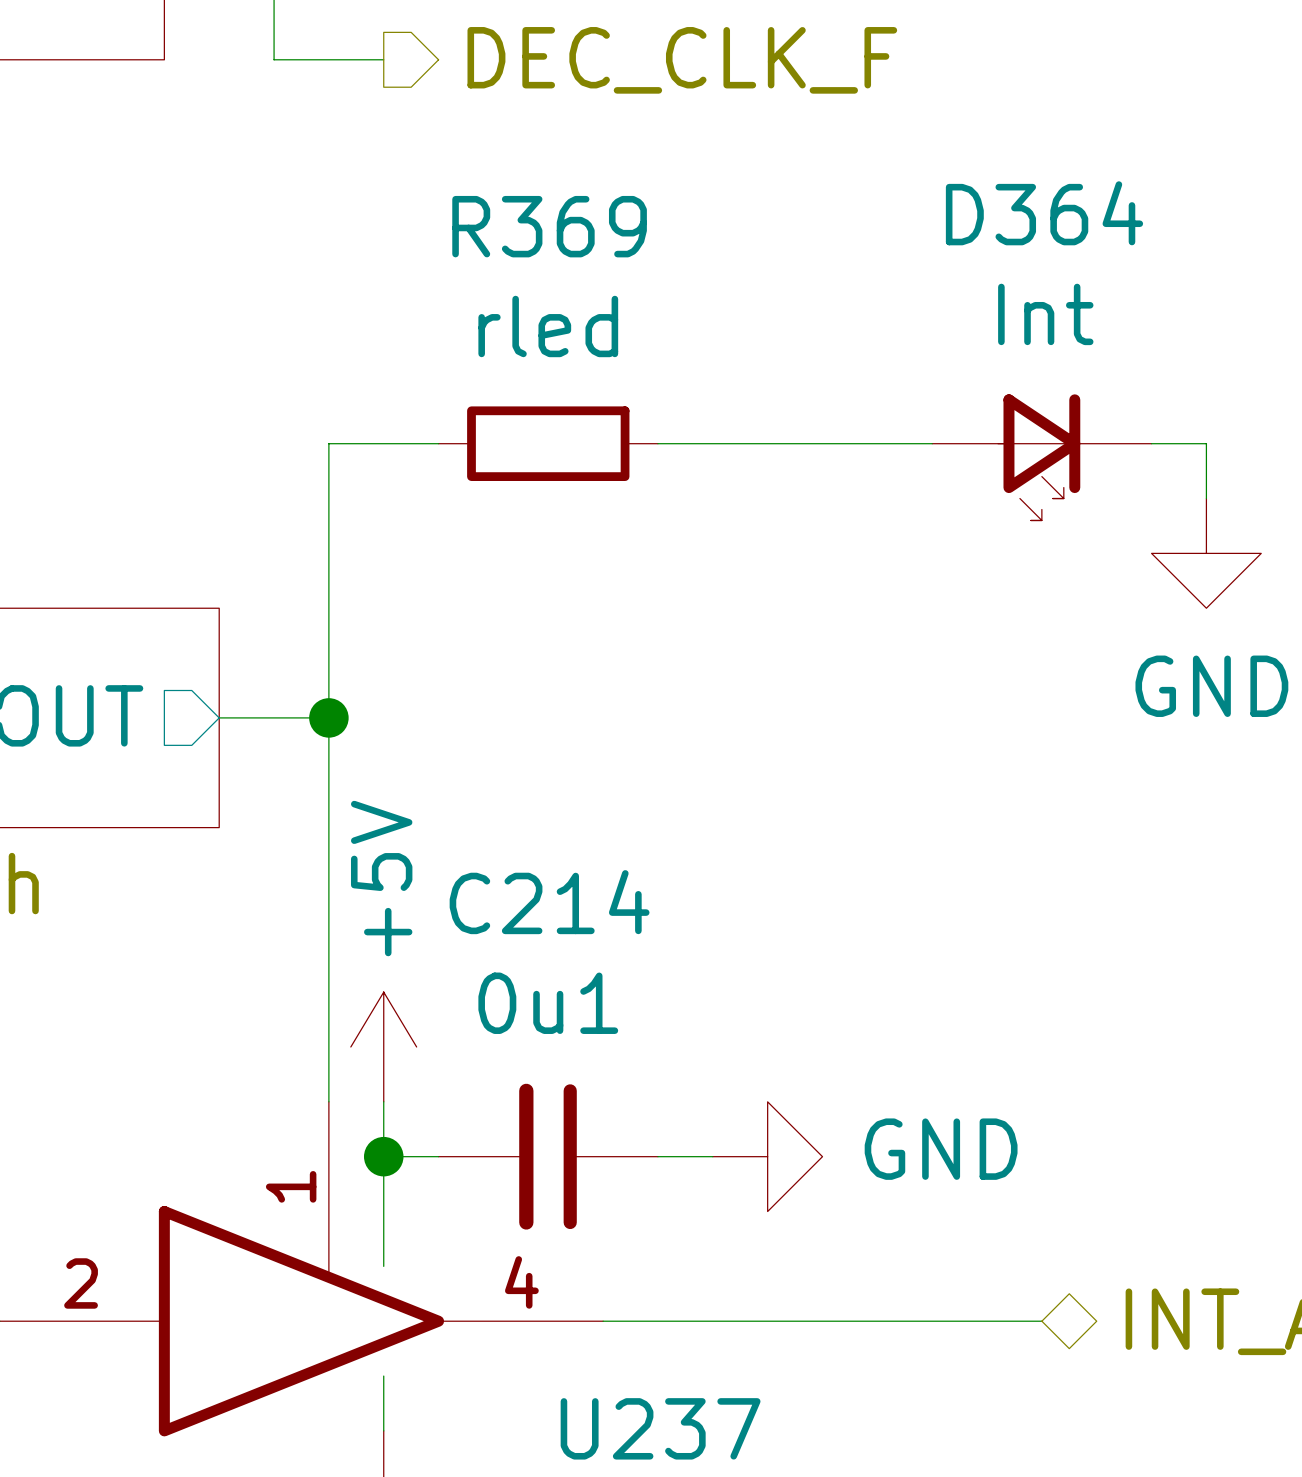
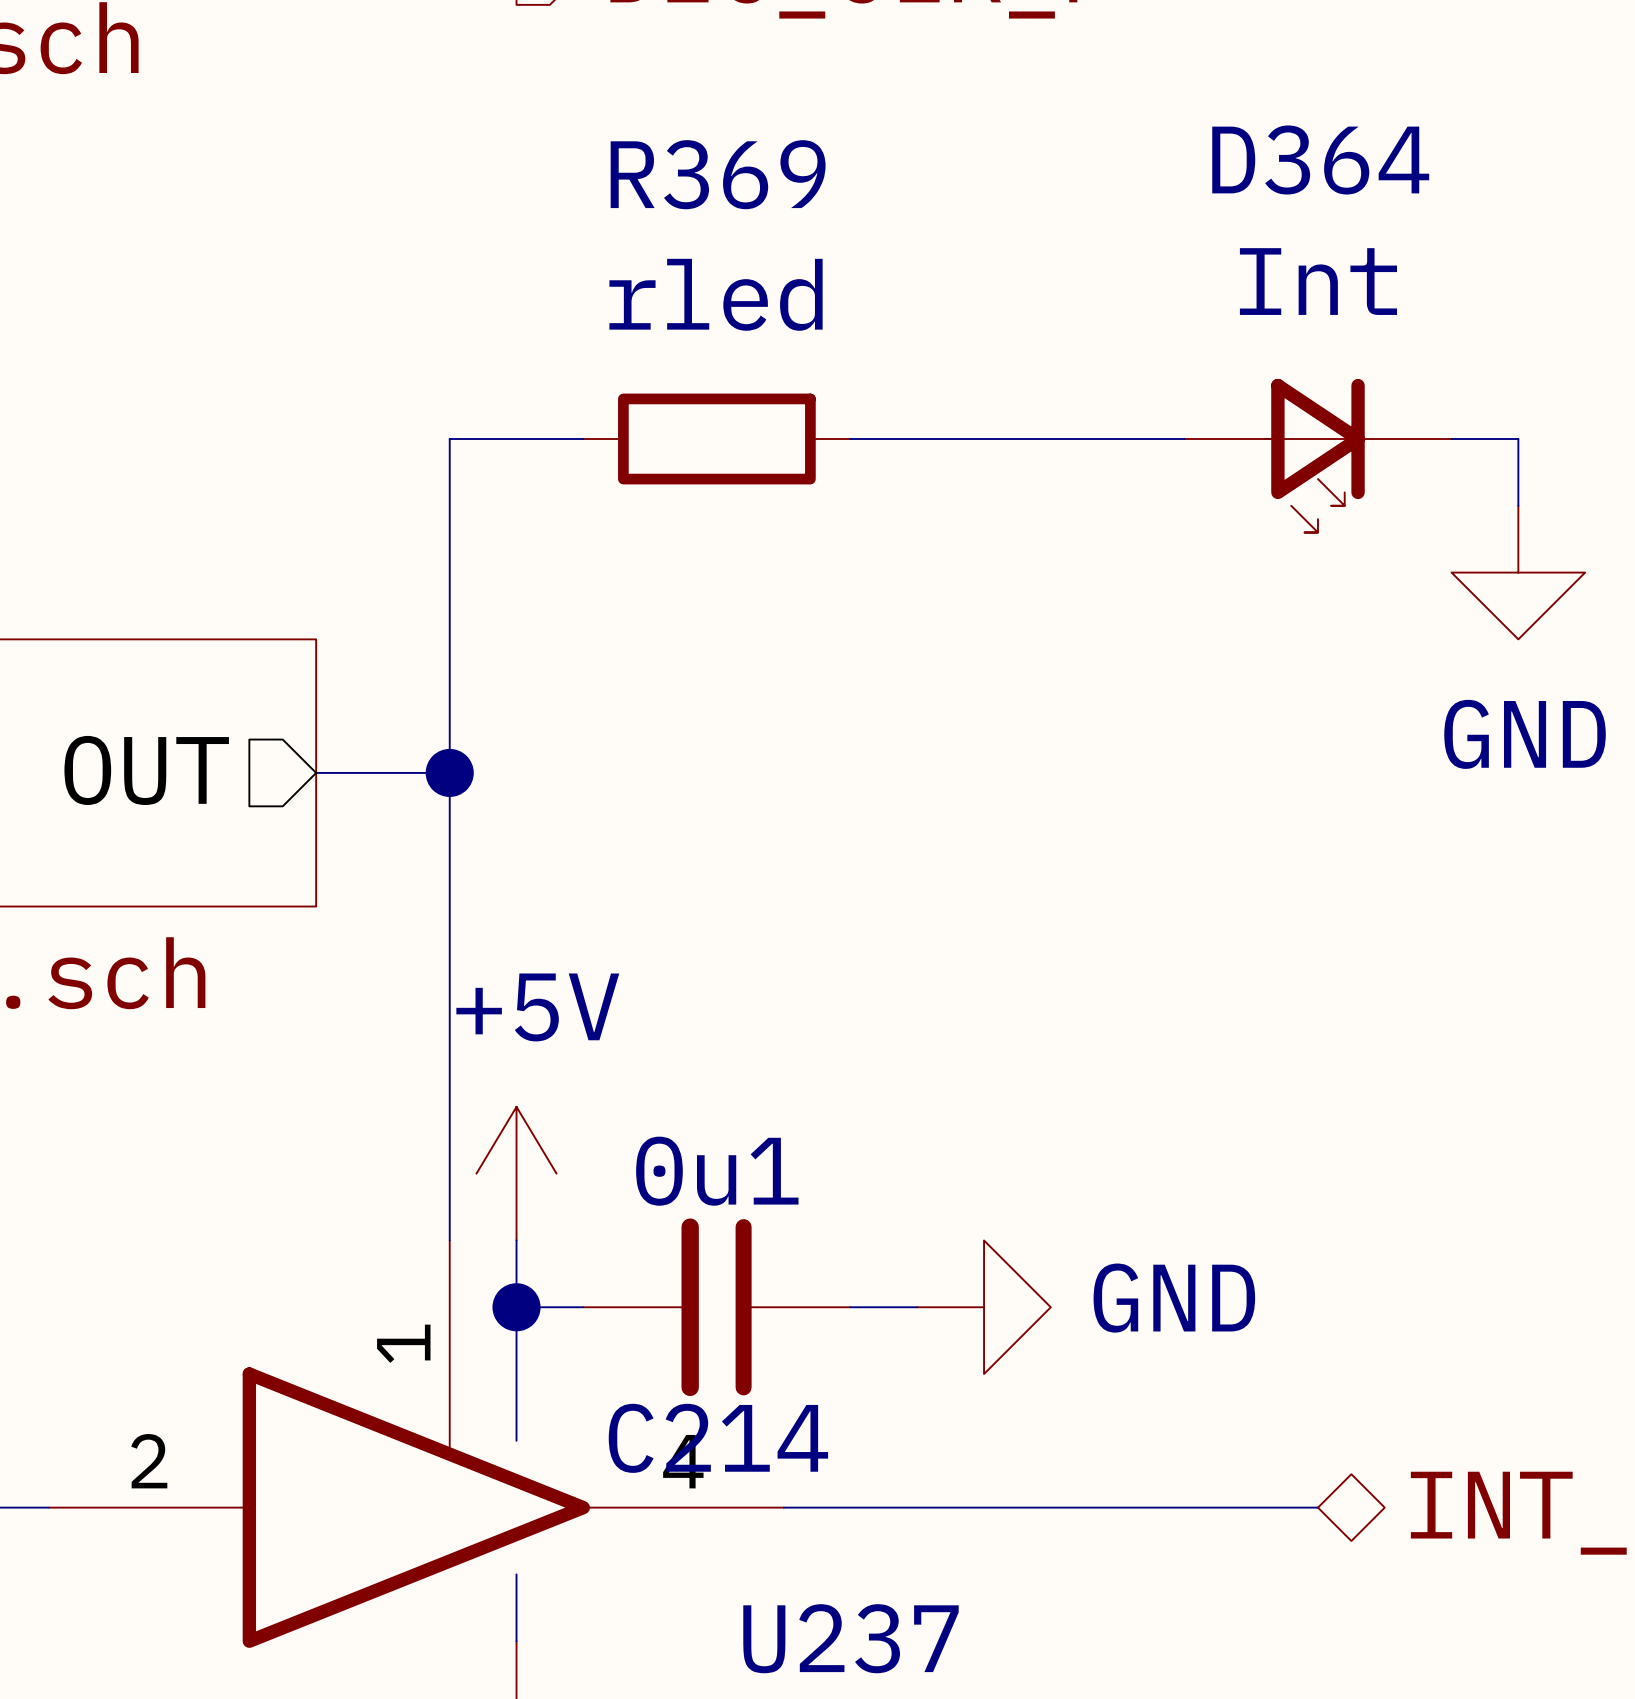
power symbol text rotation: 0° (381, 878) -> 90° clockwise (537, 1007)
C214 name position: C214 (549, 902) -> C214 (718, 1438)
C214 value position: 0u1 (548, 1003) -> 0u1 (717, 1171)

